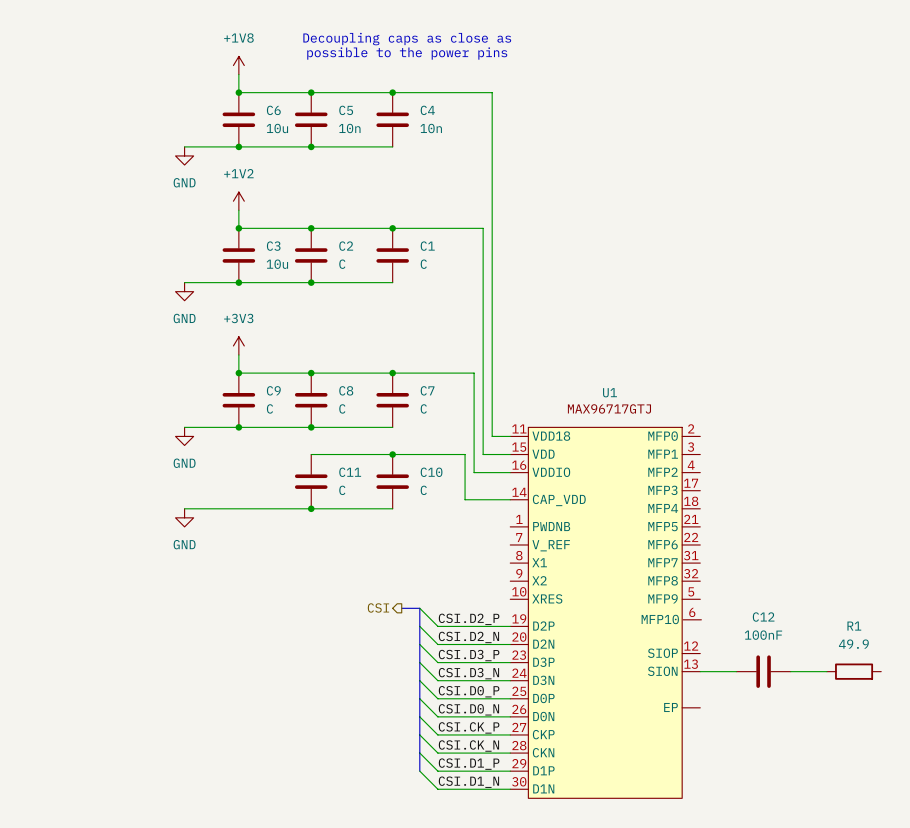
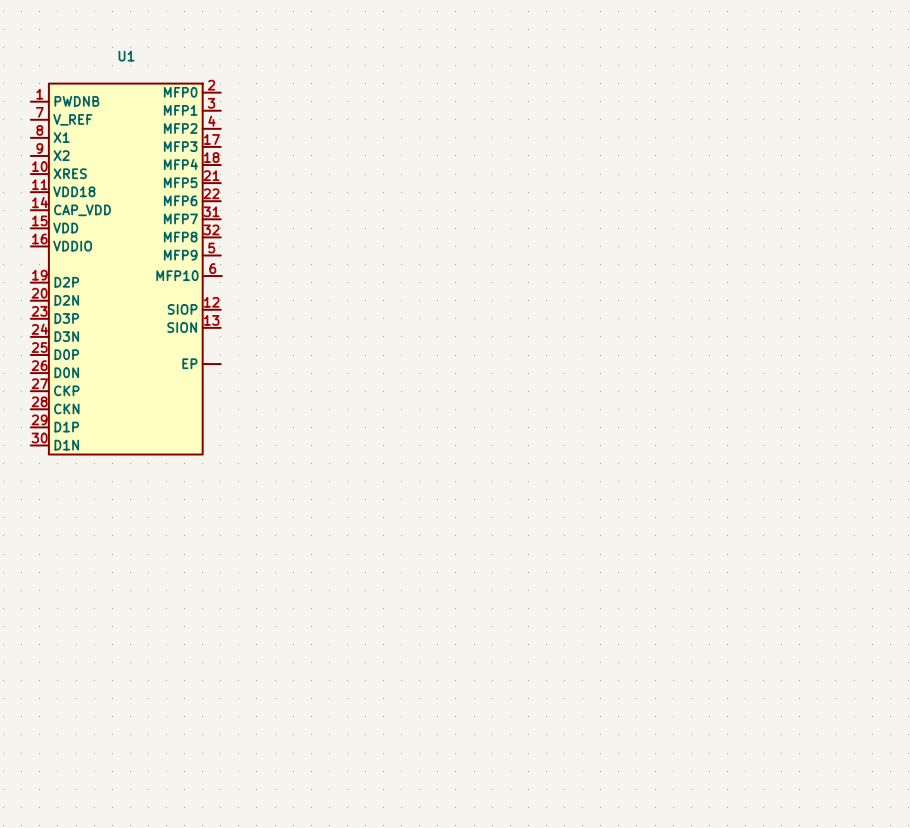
text: Decoupling caps as close as (407, 39) -> none
text: possible to the power pins (407, 53) -> none
power symbol: +1V8 (238, 65) -> none
wire: (238, 74) (238, 92) (492, 92) (492, 436) (510, 436) -> none
junction: (238, 92) -> none
junction: (311, 92) -> none
junction: (392, 92) -> none
C6: 10u (238, 119) -> none
C5: 10n (311, 119) -> none
C4: 10n (392, 119) -> none
wire: (184, 146) (392, 146) -> none
junction: (238, 146) -> none
junction: (311, 146) -> none
power symbol: GND (184, 155) -> none
power symbol: +1V2 (238, 201) -> none
wire: (238, 210) (238, 228) (483, 228) (483, 454) (510, 454) -> none
junction: (238, 228) -> none
junction: (311, 228) -> none
junction: (392, 228) -> none
C3: 10u (238, 255) -> none
C2: C (311, 255) -> none
C1: C (392, 255) -> none
wire: (184, 282) (392, 282) -> none
junction: (238, 282) -> none
junction: (311, 282) -> none
power symbol: GND (184, 291) -> none
power symbol: +3V3 (238, 345) -> none
wire: (238, 355) (238, 373) (474, 373) (474, 472) (510, 472) -> none
junction: (238, 373) -> none
junction: (311, 373) -> none
junction: (392, 373) -> none
C9: C (238, 400) -> none
C8: C (311, 400) -> none
C7: C (392, 400) -> none
wire: (184, 427) (392, 427) -> none
junction: (238, 427) -> none
junction: (311, 427) -> none
U1 symbol: [510, 427, 702, 799] -> [30, 83, 222, 455]
power symbol: GND (184, 436) -> none
wire: (311, 454) (465, 454) (465, 499) (510, 499) -> none
junction: (392, 454) -> none
C11: C (311, 481) -> none
C10: C (392, 481) -> none
wire: (184, 508) (392, 508) -> none
junction: (311, 508) -> none
power symbol: GND (184, 517) -> none
hierarchical label: CSI (378, 607) -> none
bus: (401, 608) (419, 608) (419, 771) -> none
wire: (419, 608) (437, 626) (510, 626) -> none
label: CSI.D2_P (469, 619) -> none
wire: (419, 626) (437, 644) (510, 644) -> none
label: CSI.D2_N (468, 637) -> none
wire: (419, 644) (437, 662) (510, 662) -> none
label: CSI.D3_P (469, 655) -> none
wire: (419, 662) (437, 680) (510, 680) -> none
wire: (700, 671) (736, 671) -> none
C12: 100nF (763, 671) -> none
wire: (790, 671) (826, 671) -> none
R1: 49.9 (854, 671) -> none
label: CSI.D3_N (468, 673) -> none
wire: (419, 680) (437, 698) (510, 698) -> none
label: CSI.D0_P (469, 691) -> none
wire: (419, 698) (437, 716) (510, 716) -> none
label: CSI.D0_N (468, 709) -> none
wire: (419, 716) (437, 734) (510, 734) -> none
label: CSI.CK_P (469, 727) -> none
wire: (419, 734) (437, 753) (510, 753) -> none
label: CSI.CK_N (468, 746) -> none
wire: (419, 753) (437, 771) (510, 771) -> none
label: CSI.D1_P (469, 764) -> none
wire: (419, 771) (437, 789) (510, 789) -> none
label: CSI.D1_N (468, 782) -> none

